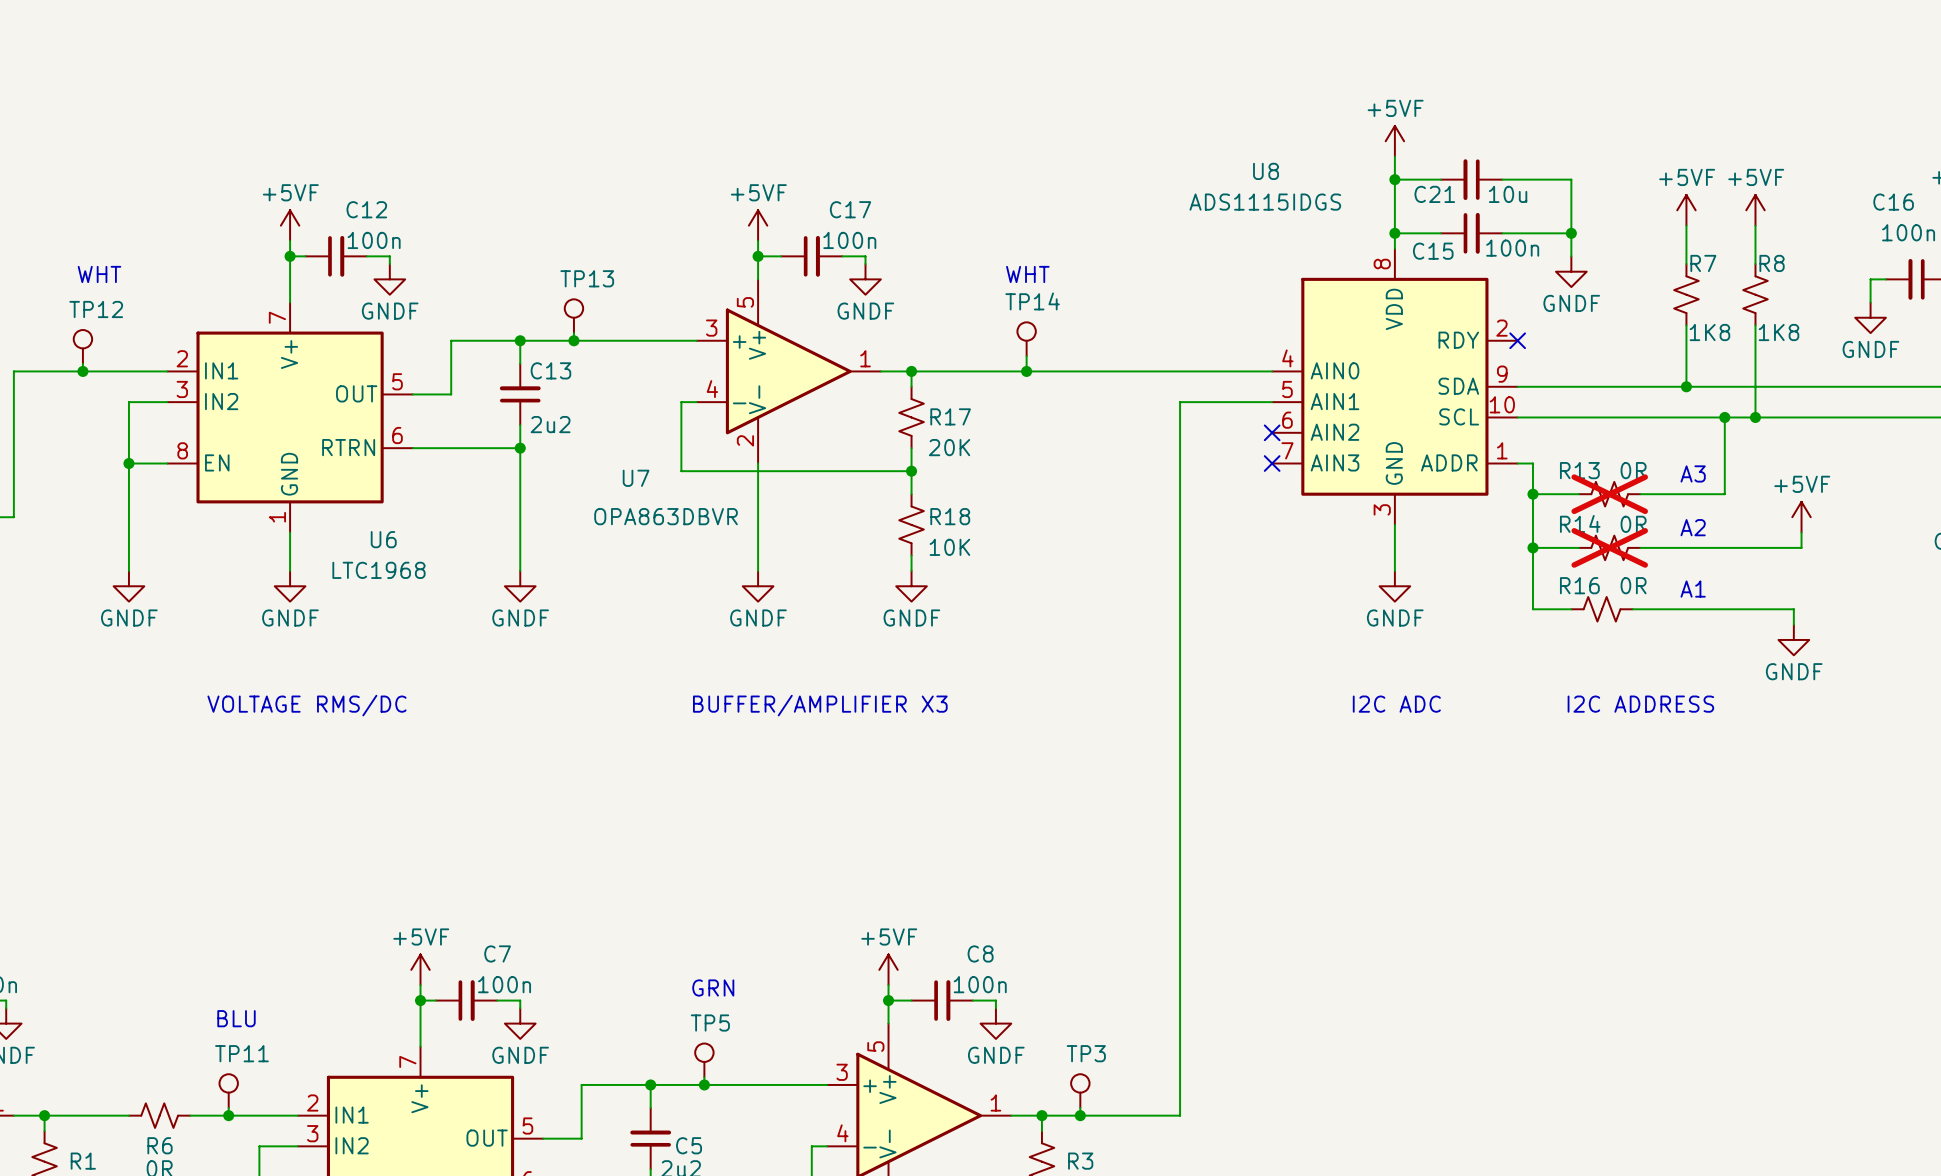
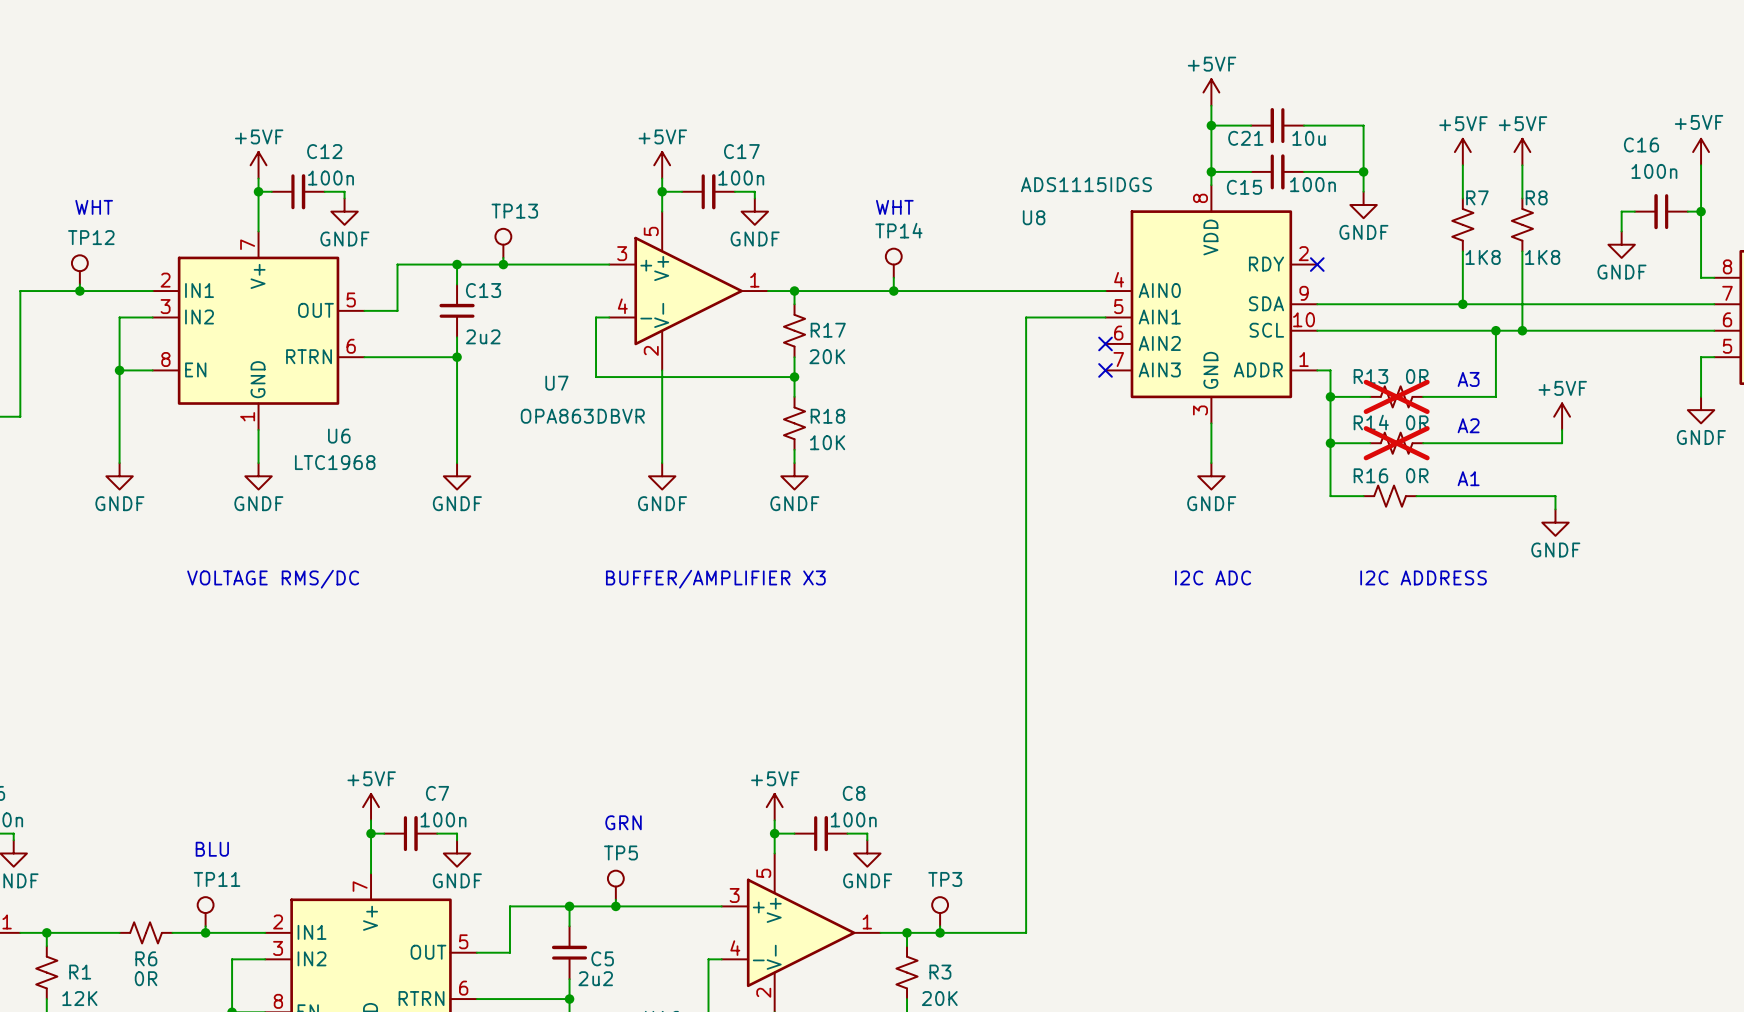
U8 name position: U8 (1266, 171) -> U8 (1034, 217)
U8 value position: ADS1115IDGS (1265, 202) -> ADS1115IDGS (1086, 184)

